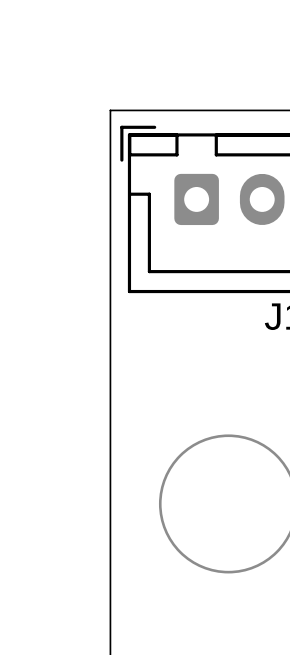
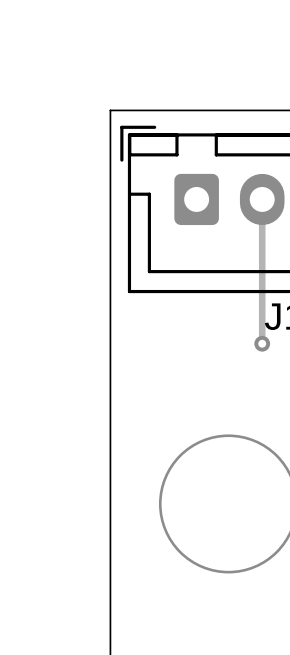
track: none -> (262, 199) (262, 343)
via: none -> (262, 343)

